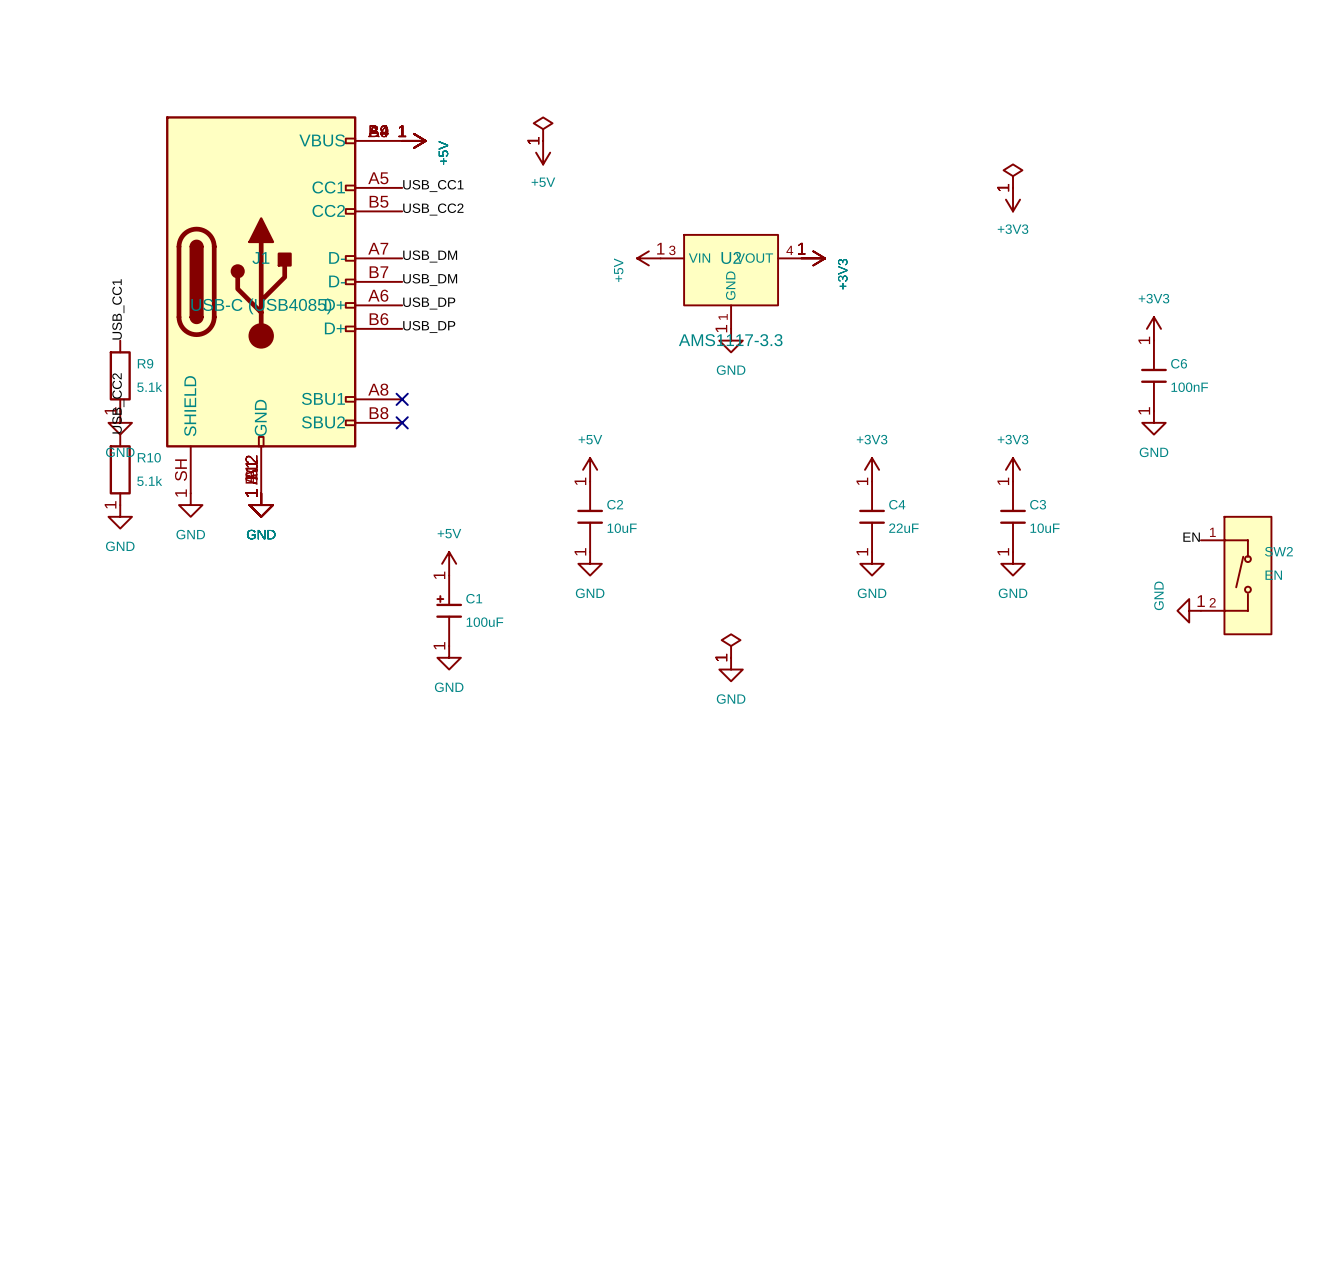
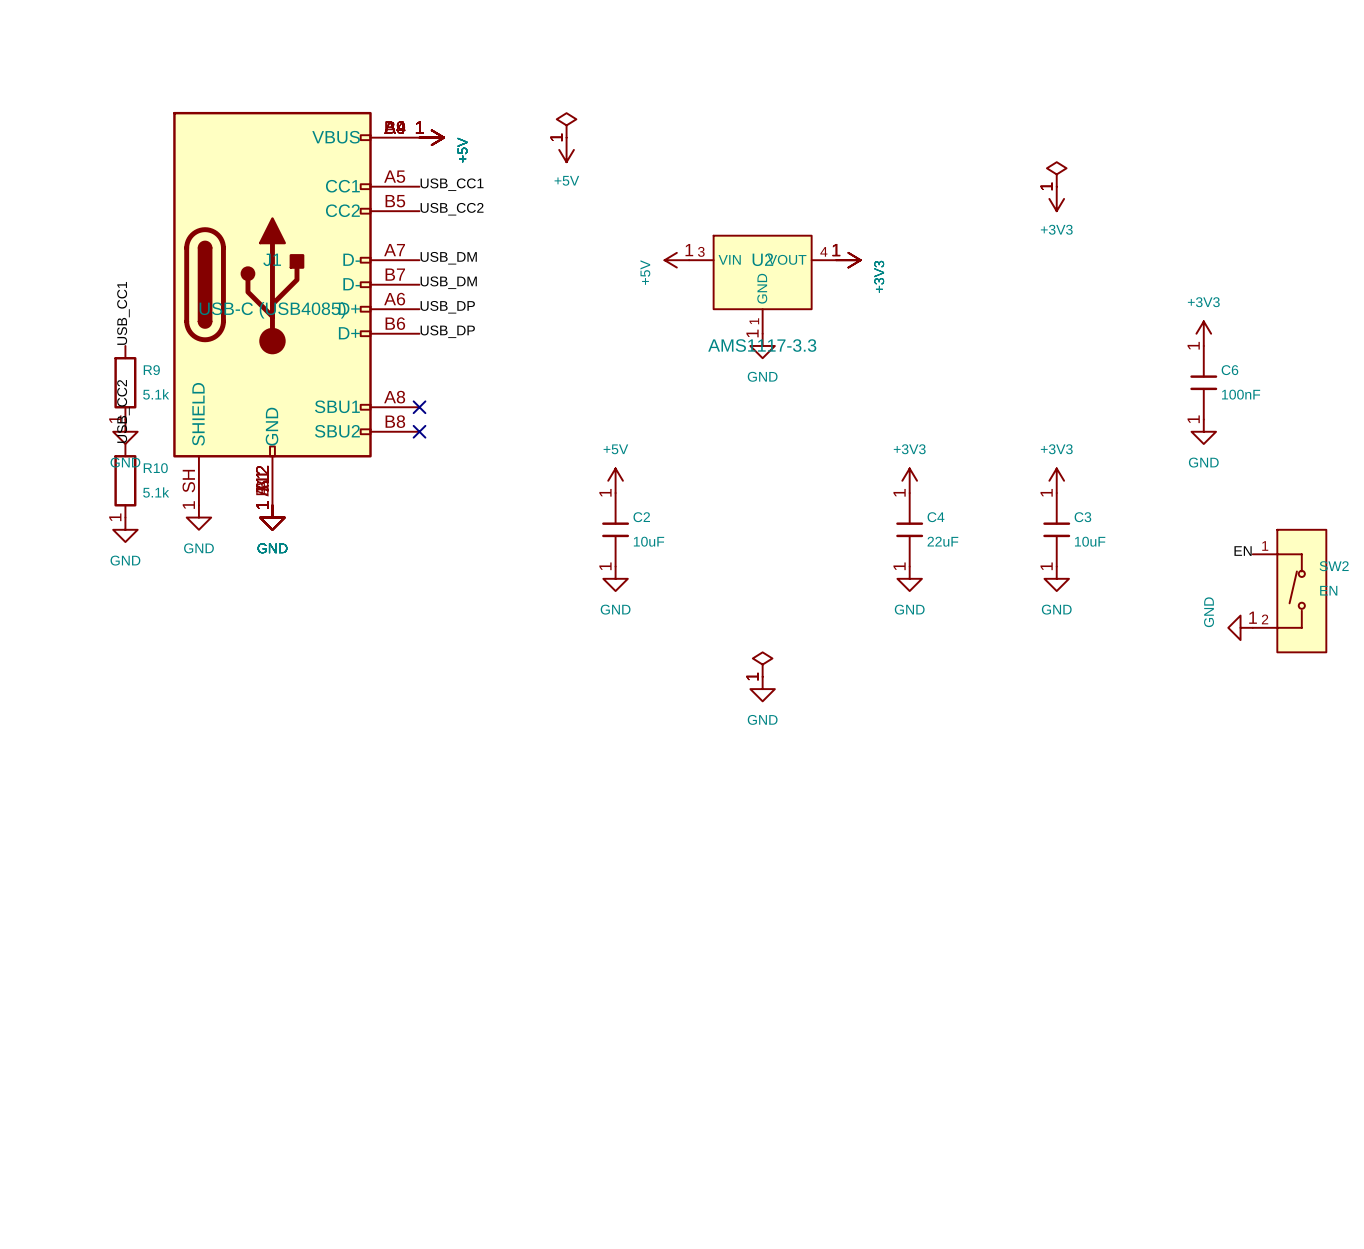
power symbol: +5V (449, 563) -> none
C1: 100uF (449, 610) -> none
power symbol: GND (449, 657) -> none

